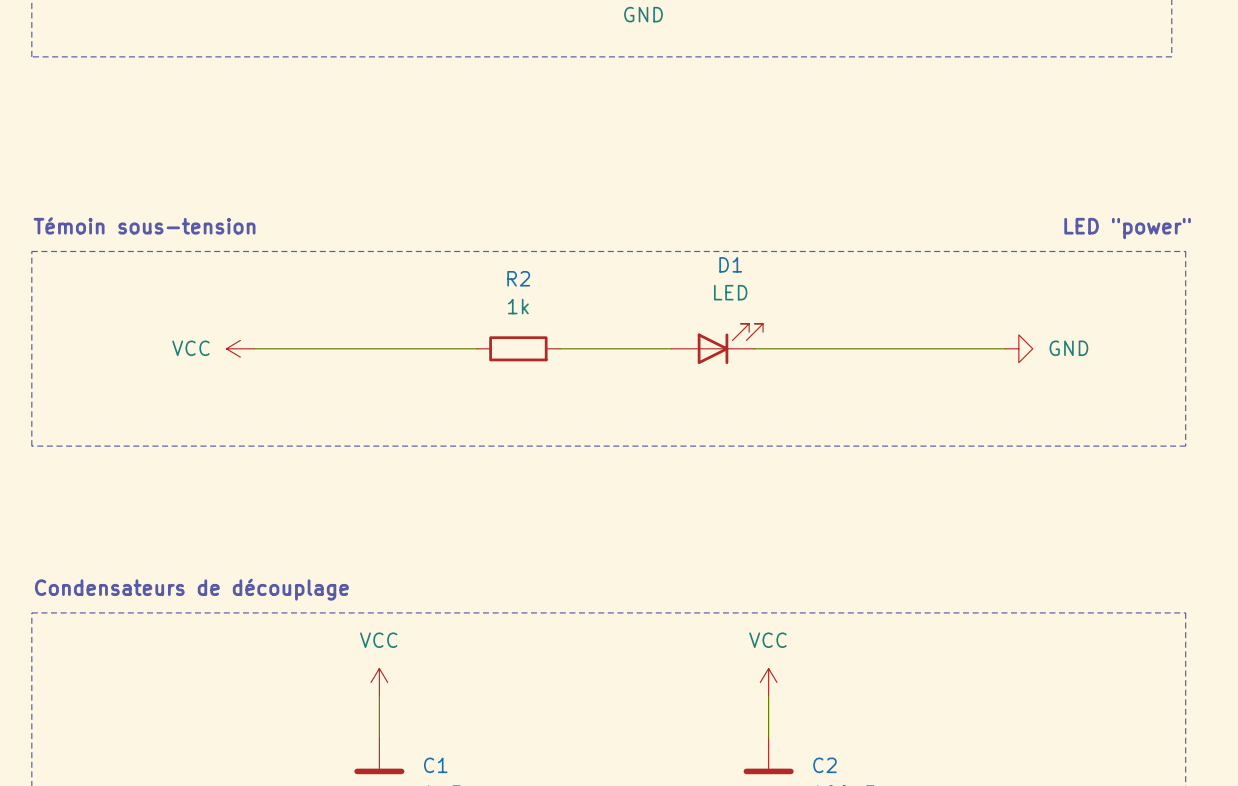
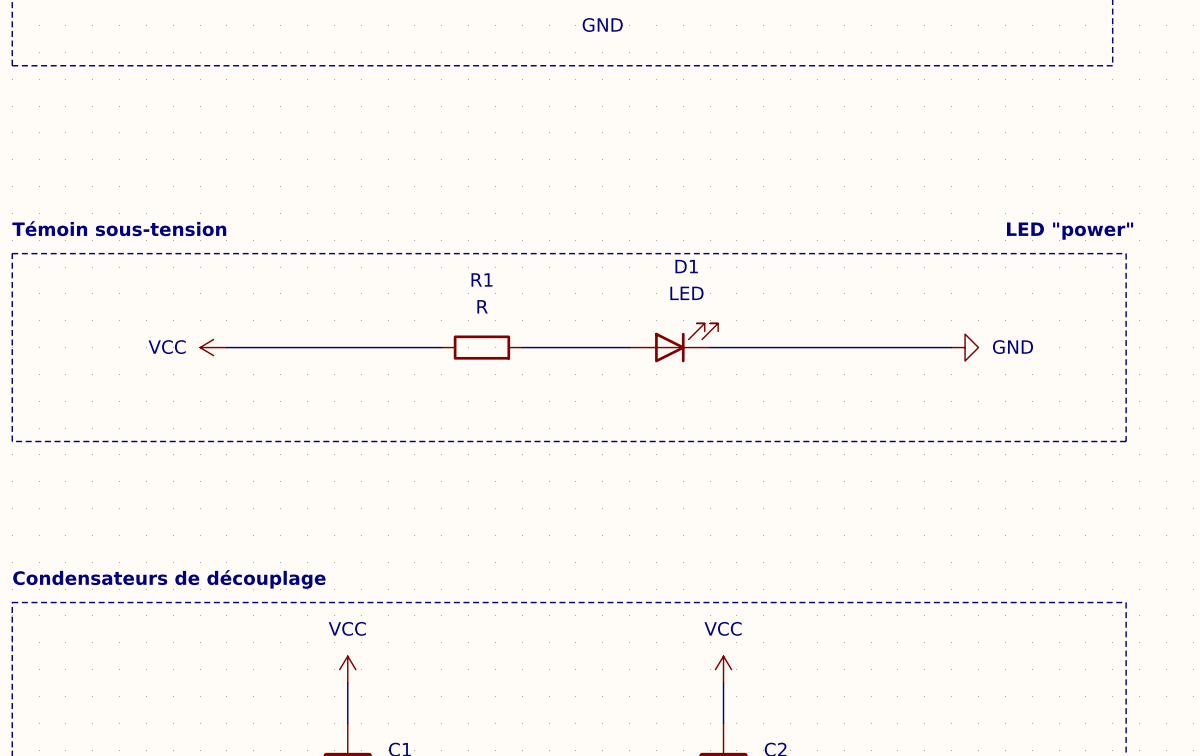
R2 name: R2 (518, 278) -> R1 (482, 279)
R2 value: 1k (518, 306) -> R (482, 306)

